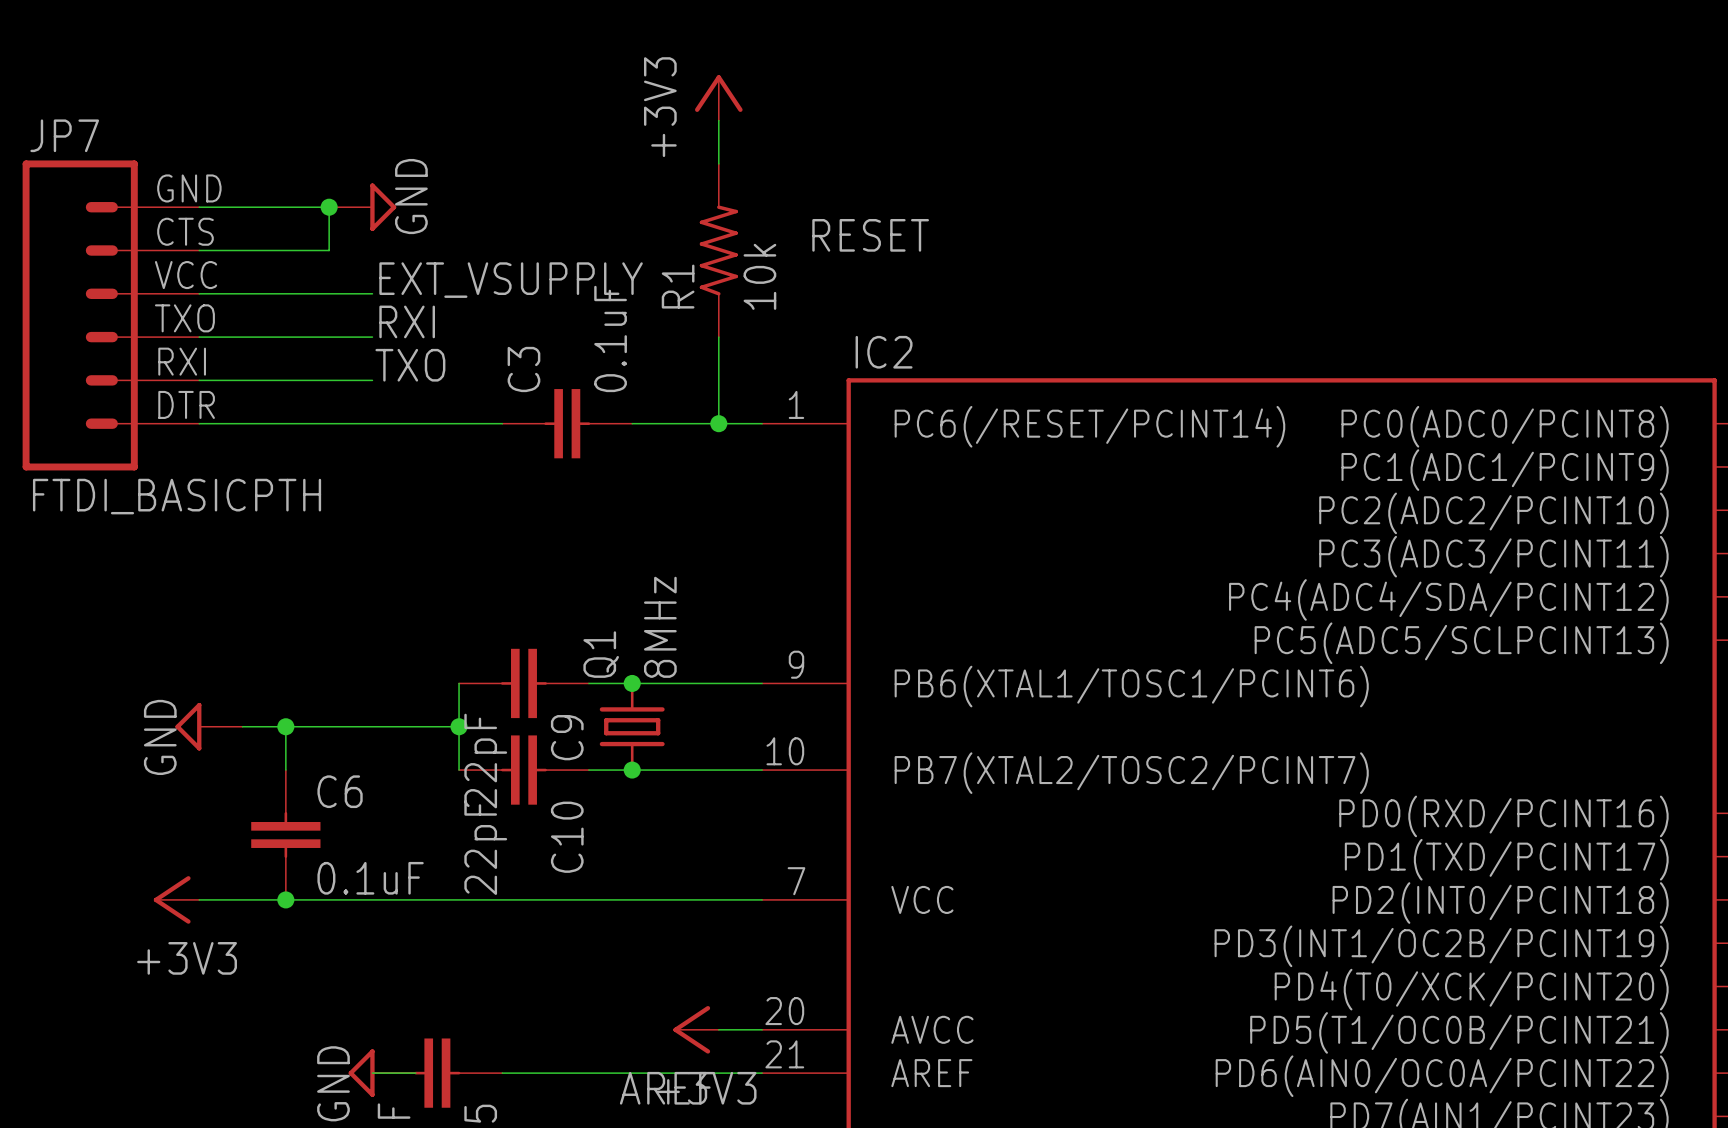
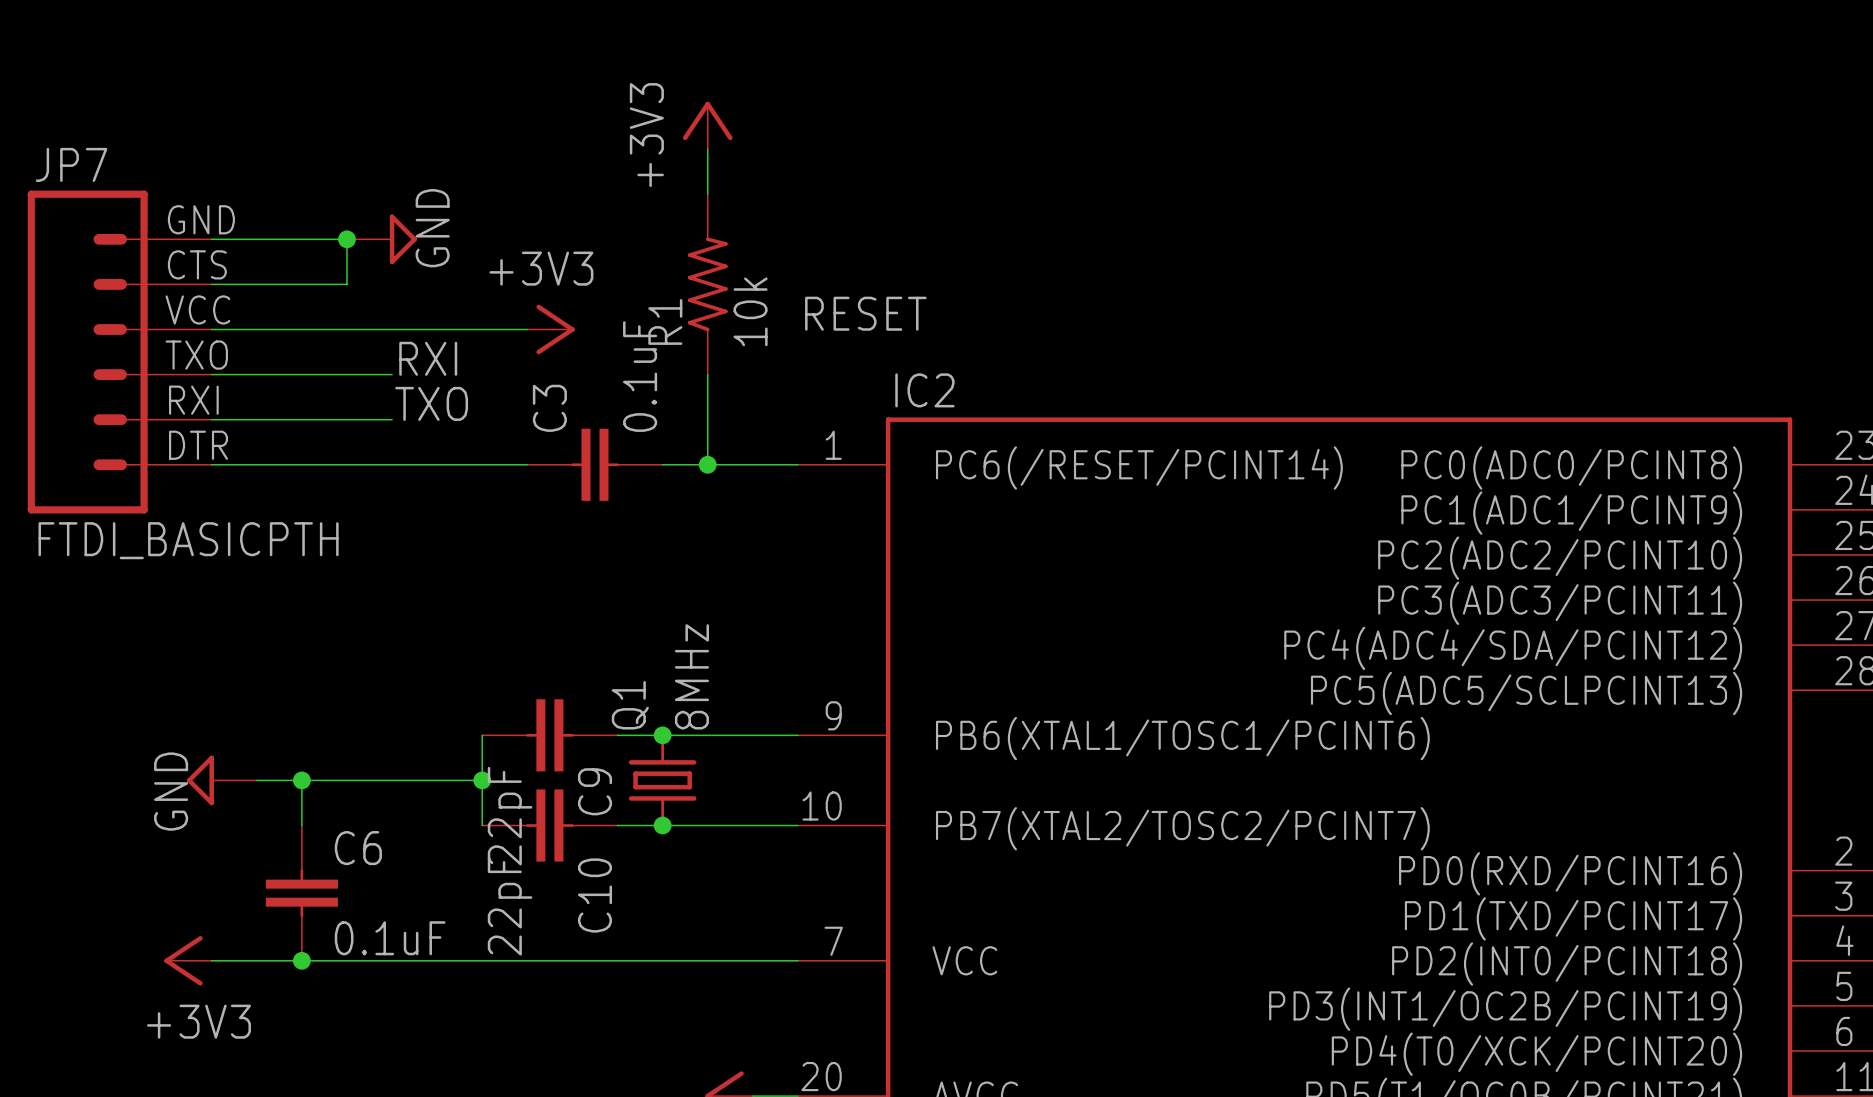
power symbol position: +3V3 (718, 97) -> +3V3 (707, 125)
wire: (718, 120) (718, 163) -> (707, 149) (707, 194)
label position: RESET (870, 235) -> RESET (865, 313)
R1 position: (718, 250) -> (707, 284)
label: EXT_VSUPPLY (511, 280) -> none
wire: none -> (392, 329) (527, 329)
power symbol: none -> +3V3 (551, 329)
wire: (718, 337) (718, 423) -> (707, 374) (707, 464)
junction position: (718, 423) -> (707, 464)

